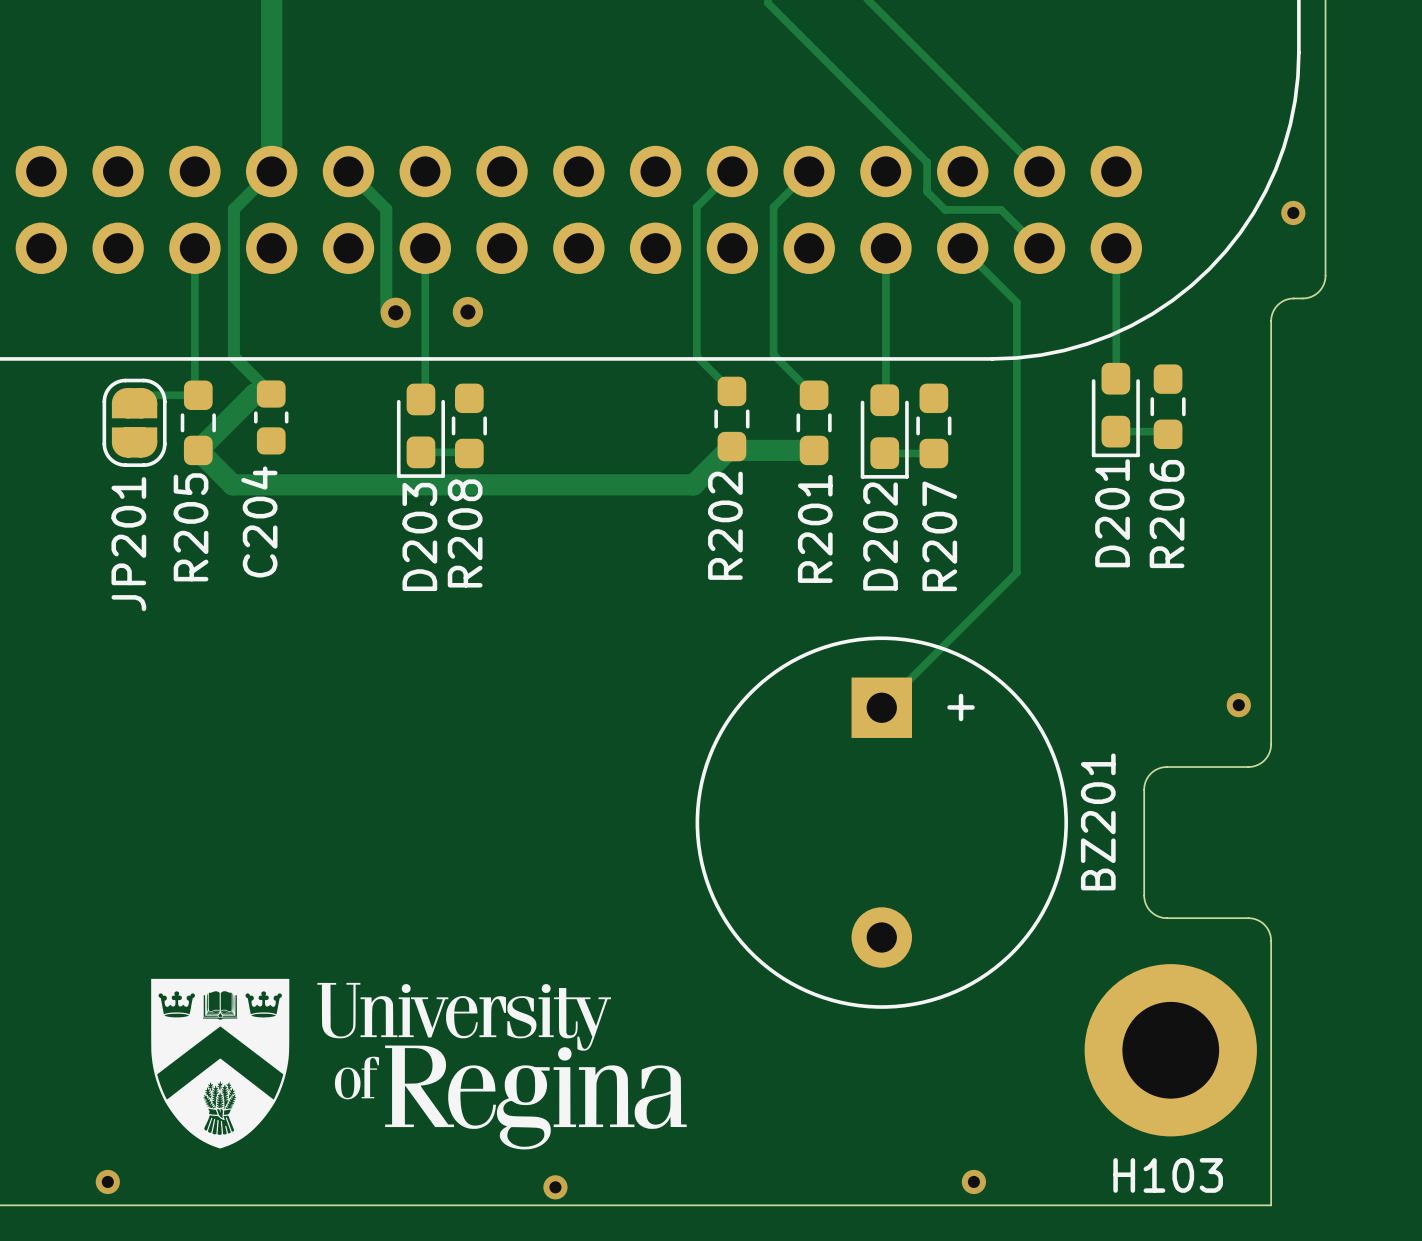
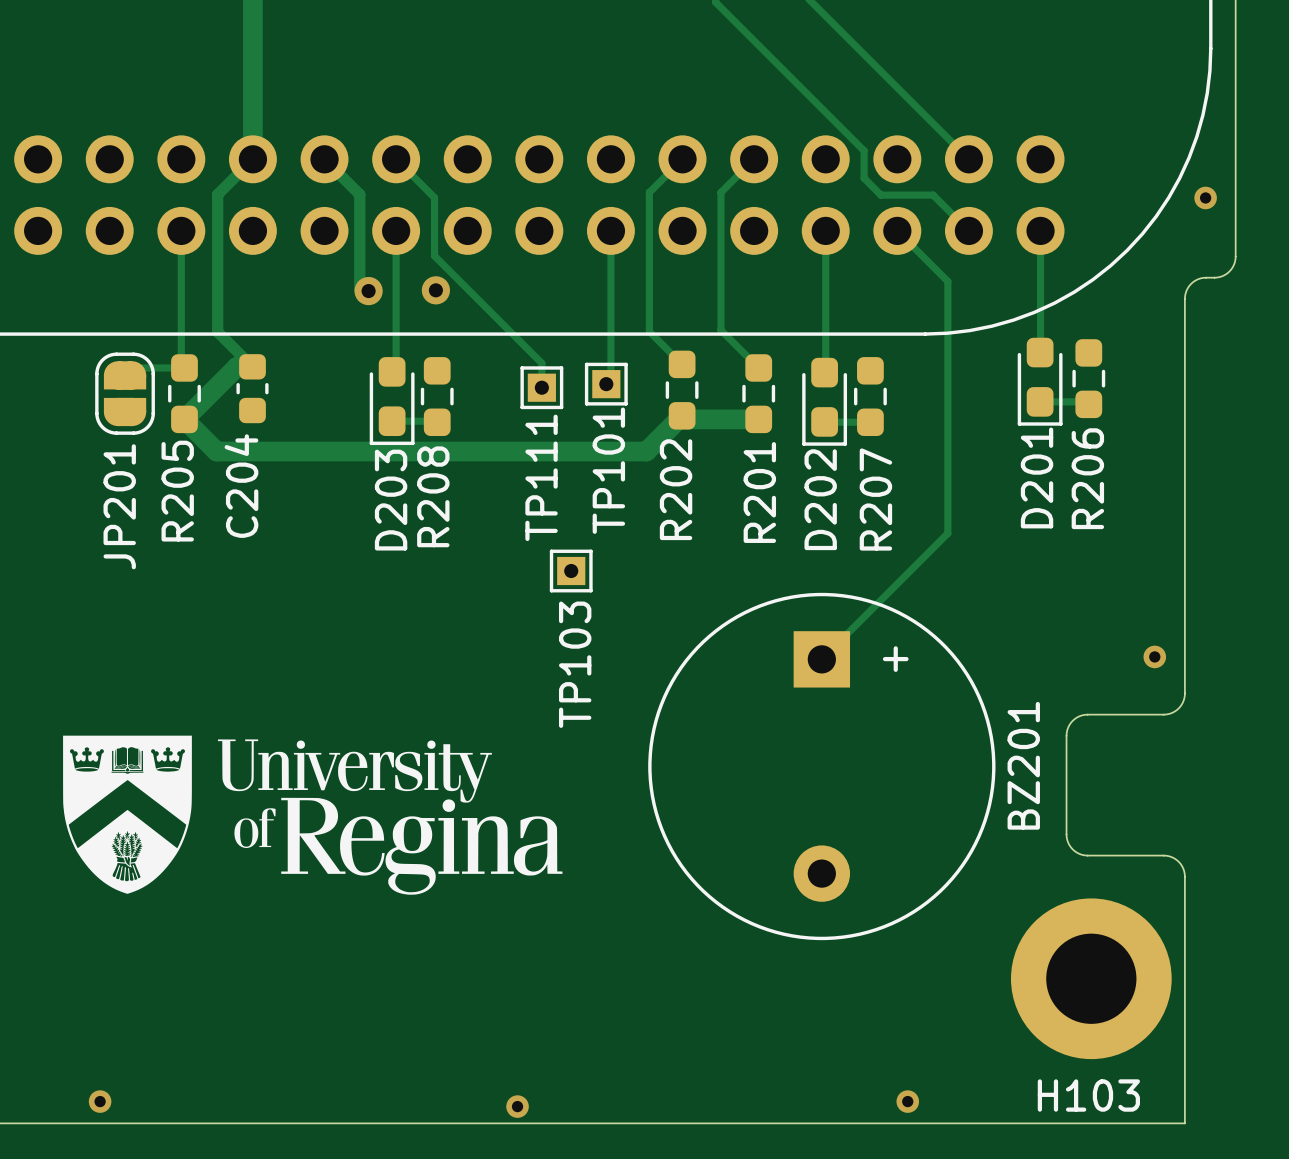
track: none -> (396, 159) (434, 197) (434, 256) (541, 363) (541, 387)
track: none -> (610, 230) (610, 379) (606, 384)
TP101: none -> (606, 384)
TP111: none -> (541, 387)
TP103: none -> (571, 571)
drawing position: (418, 1064) -> (312, 815)

